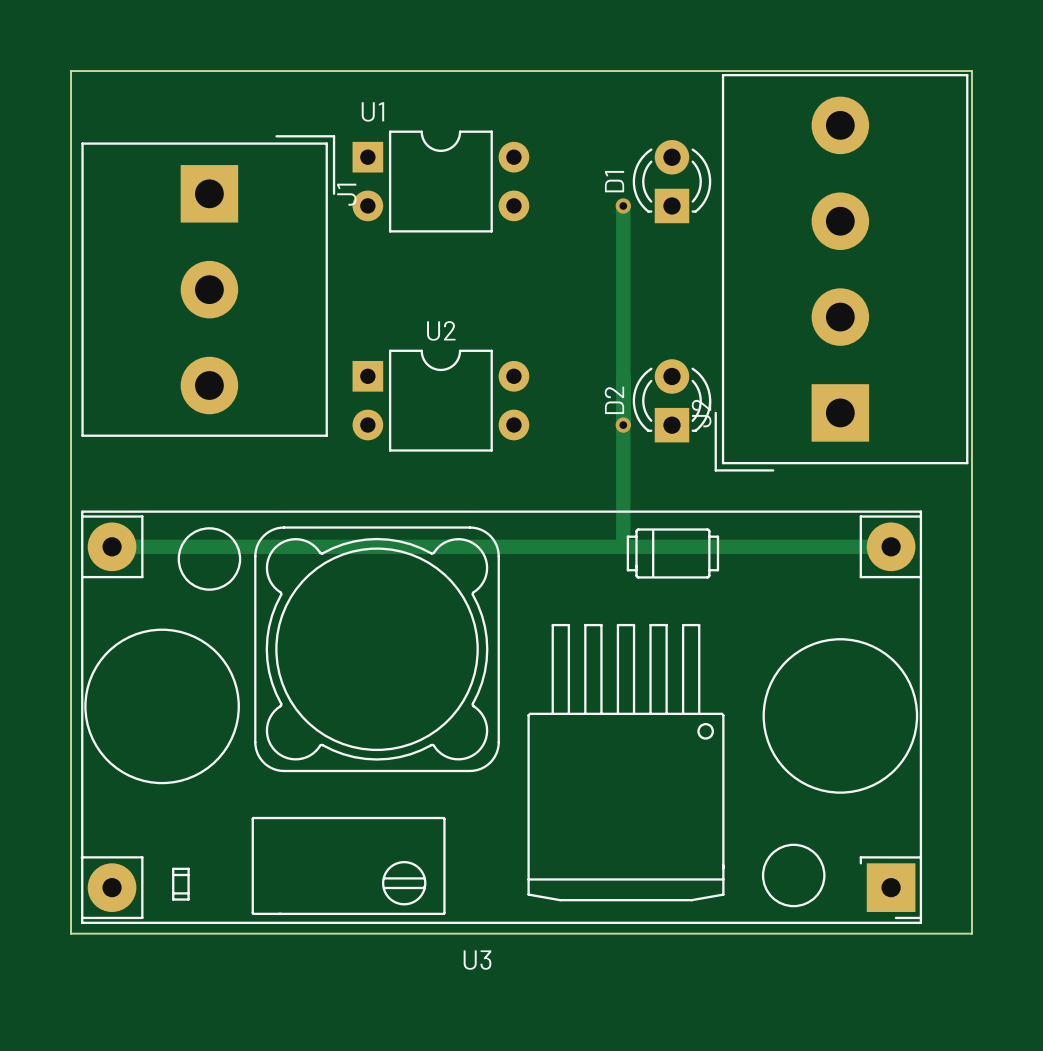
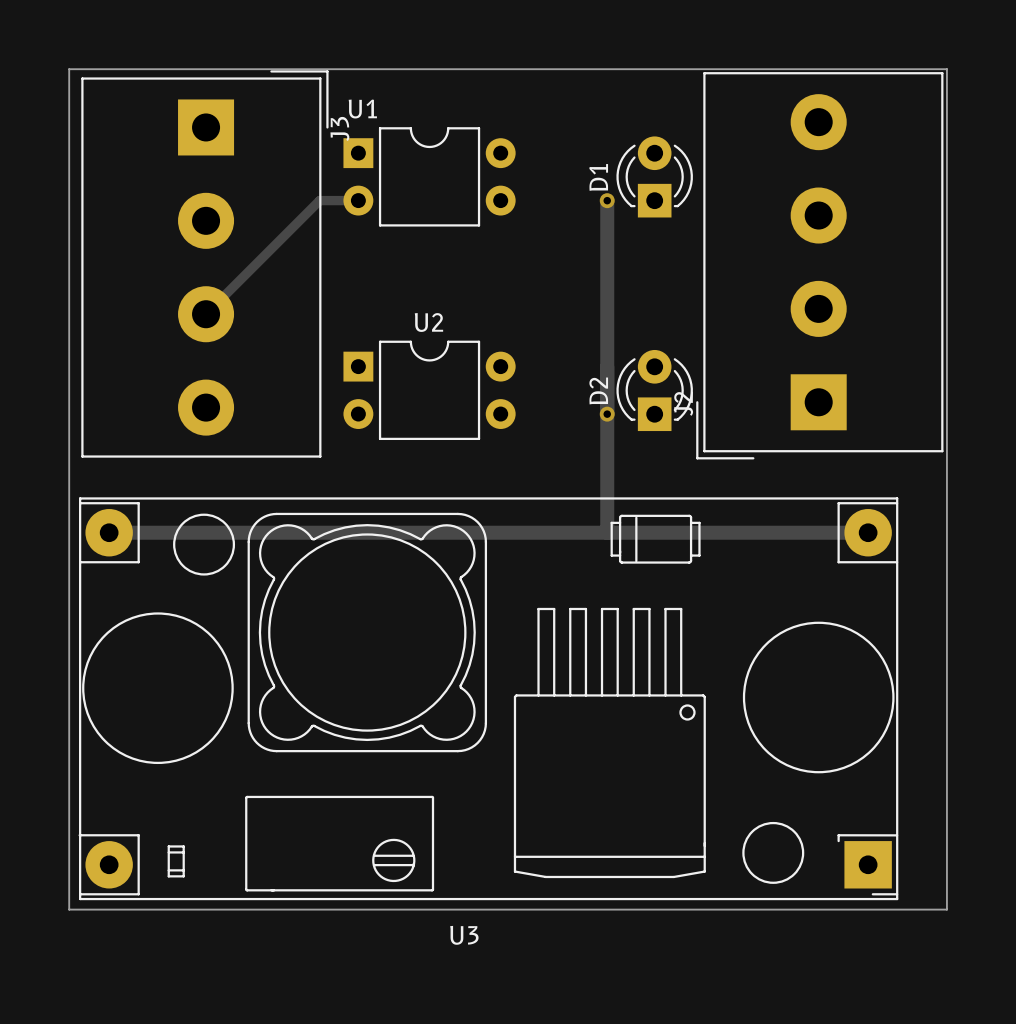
track: none -> (358, 200) (319, 200) (206, 314)
J3: none -> (204, 263)
J1: (208, 286) -> none

